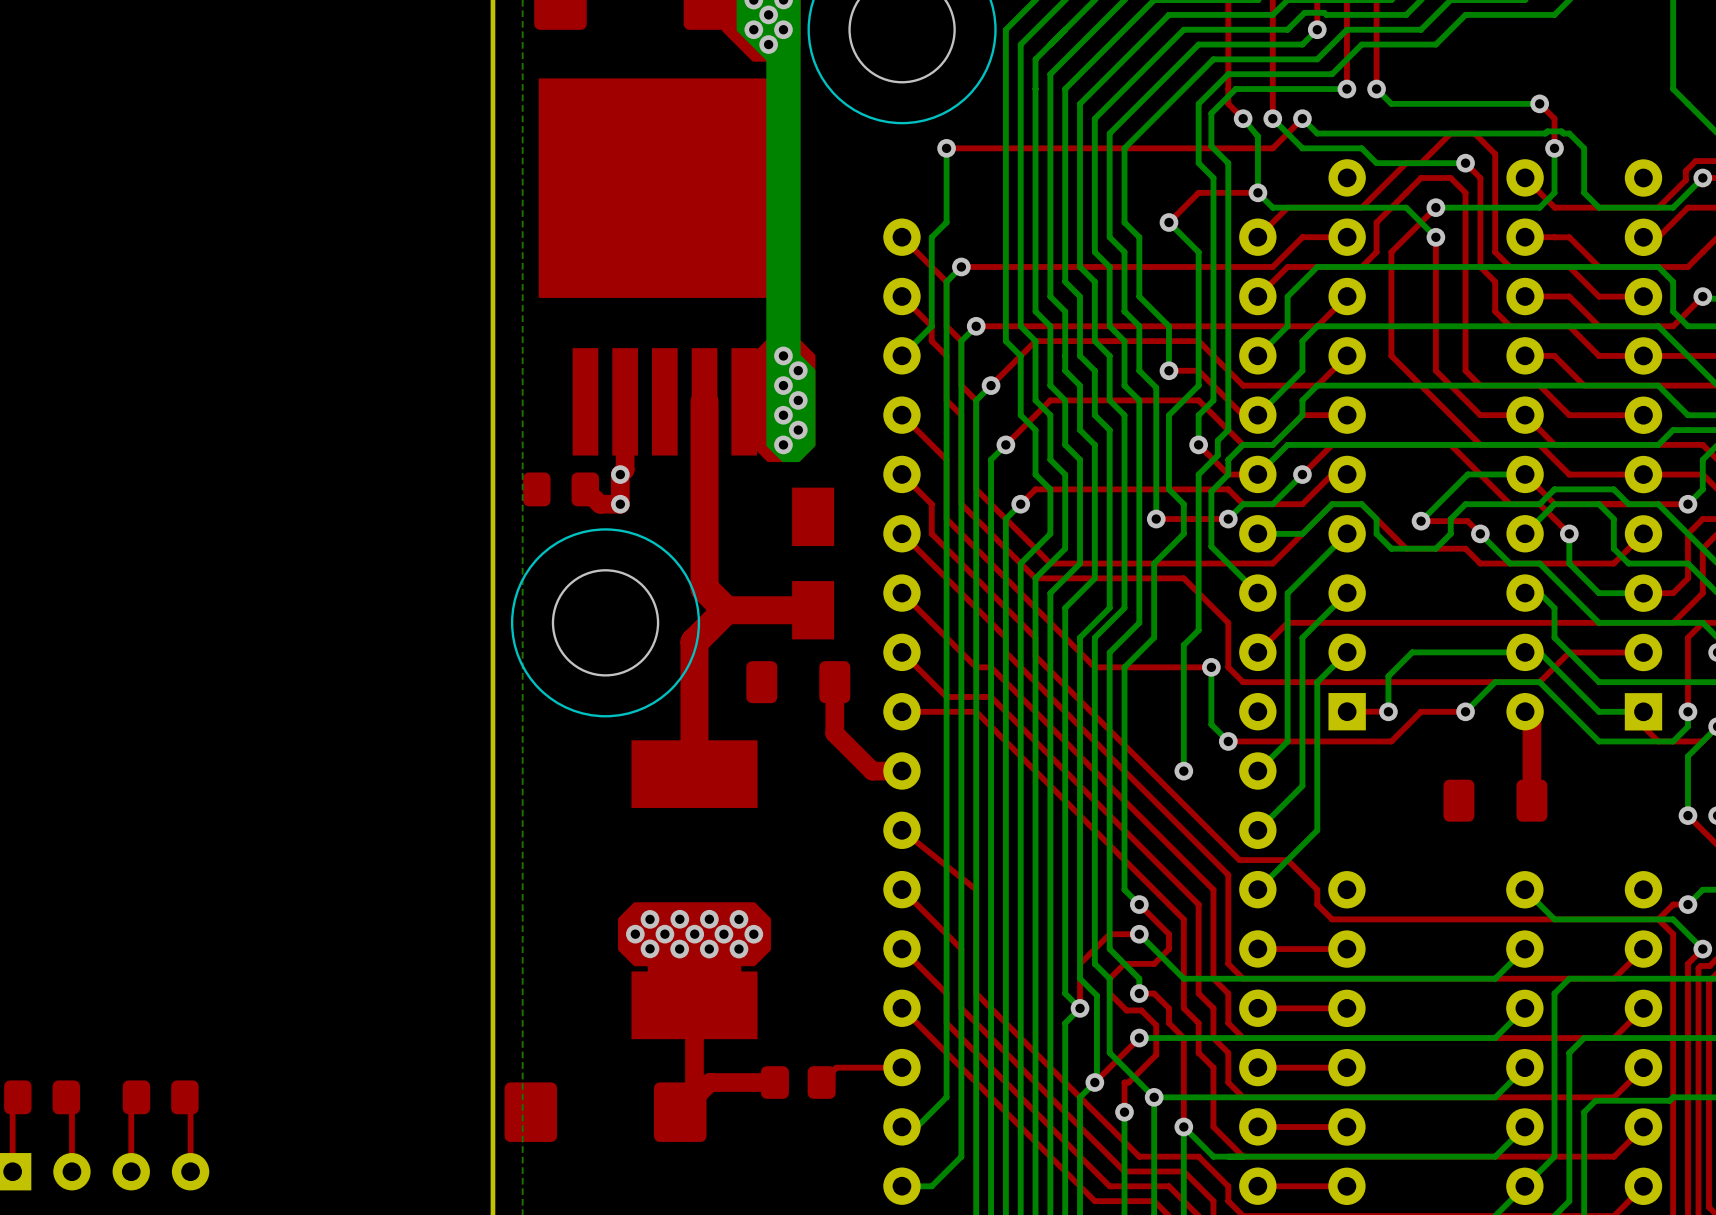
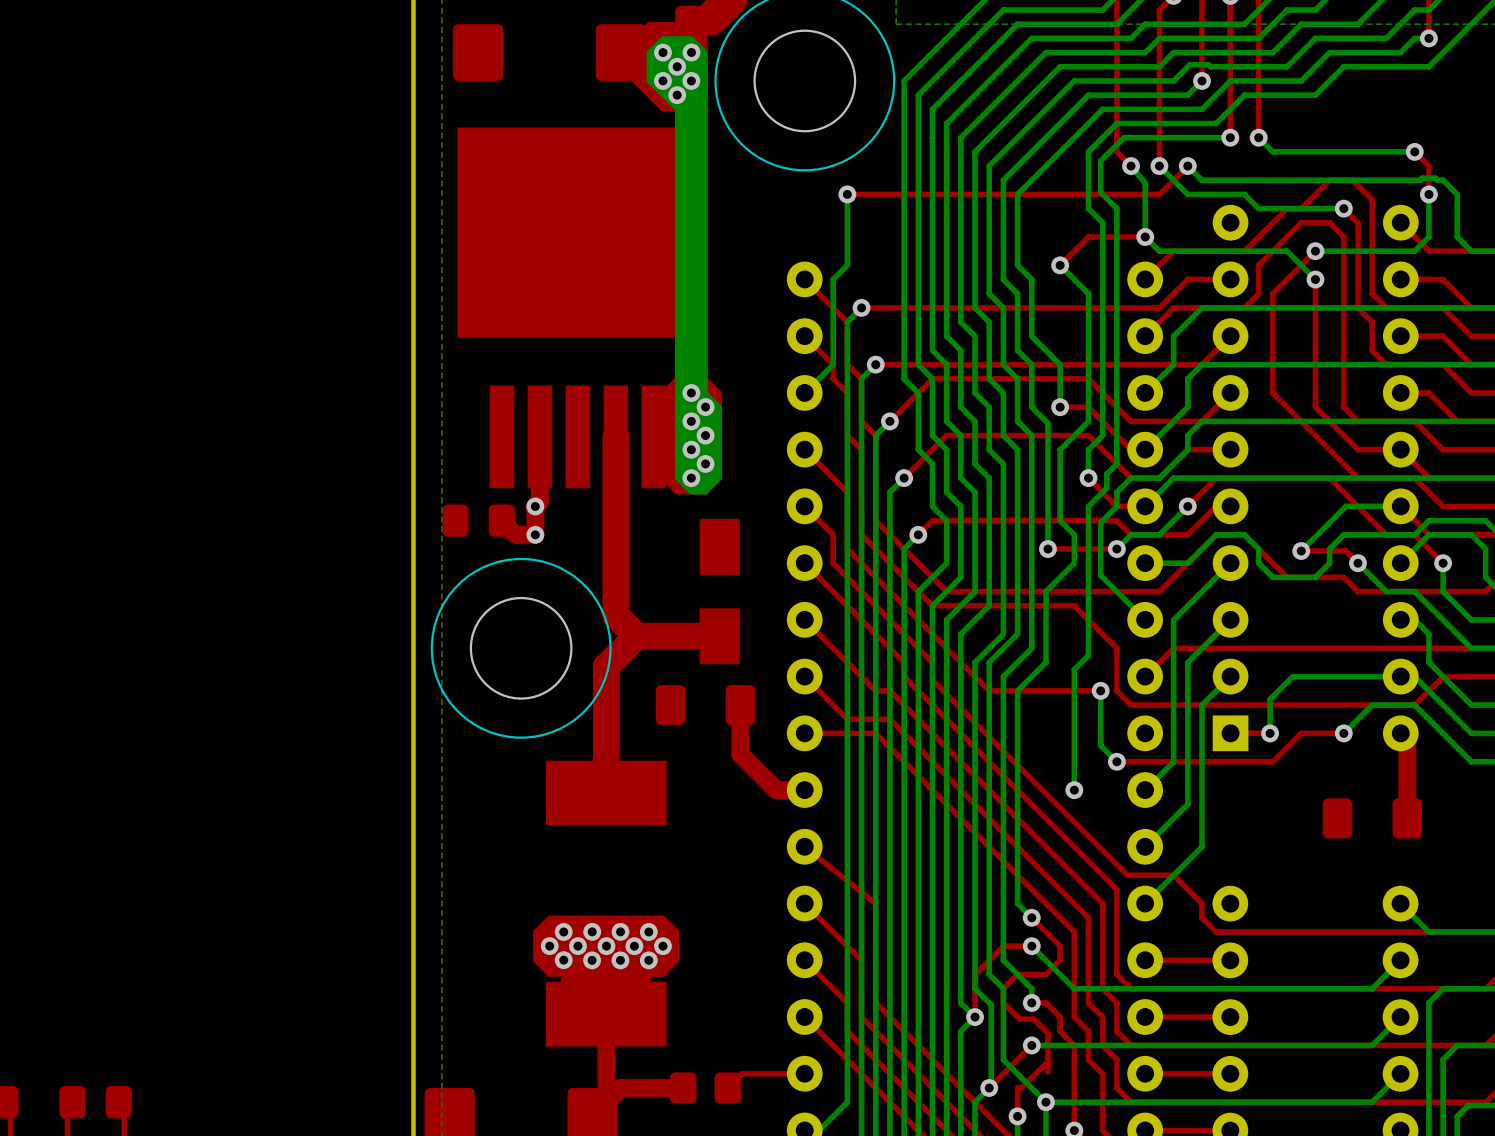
top track: none -> (1047, 1061) (1047, 1071)

